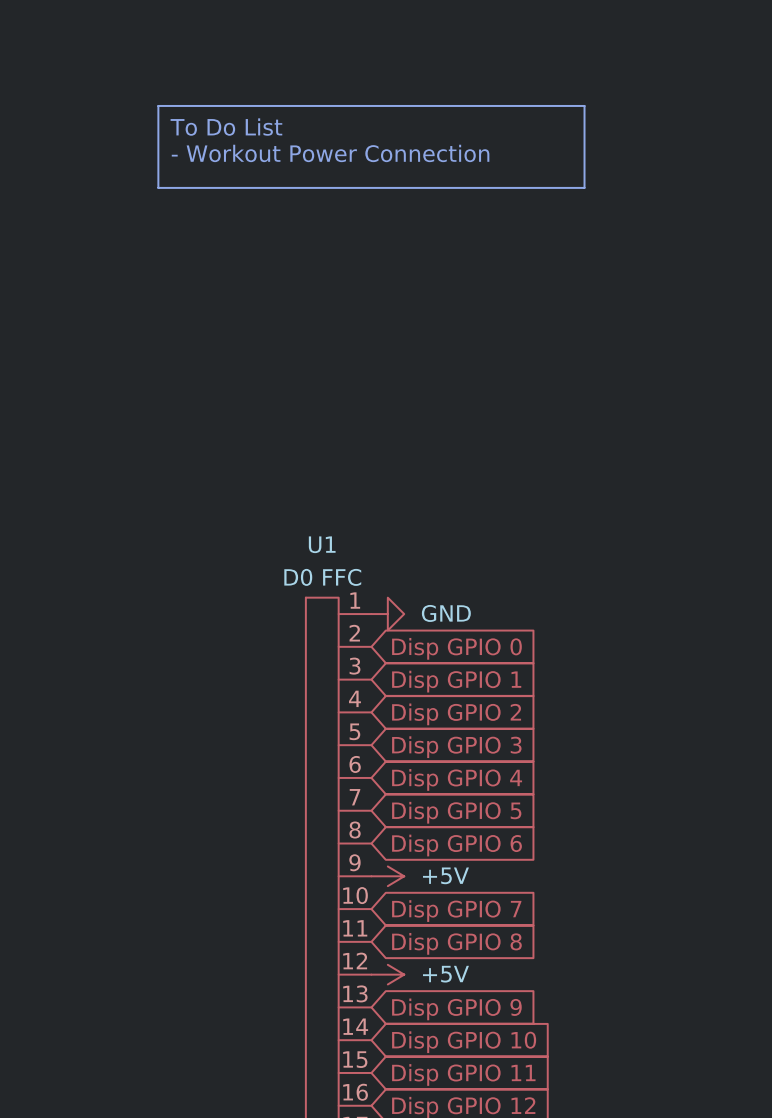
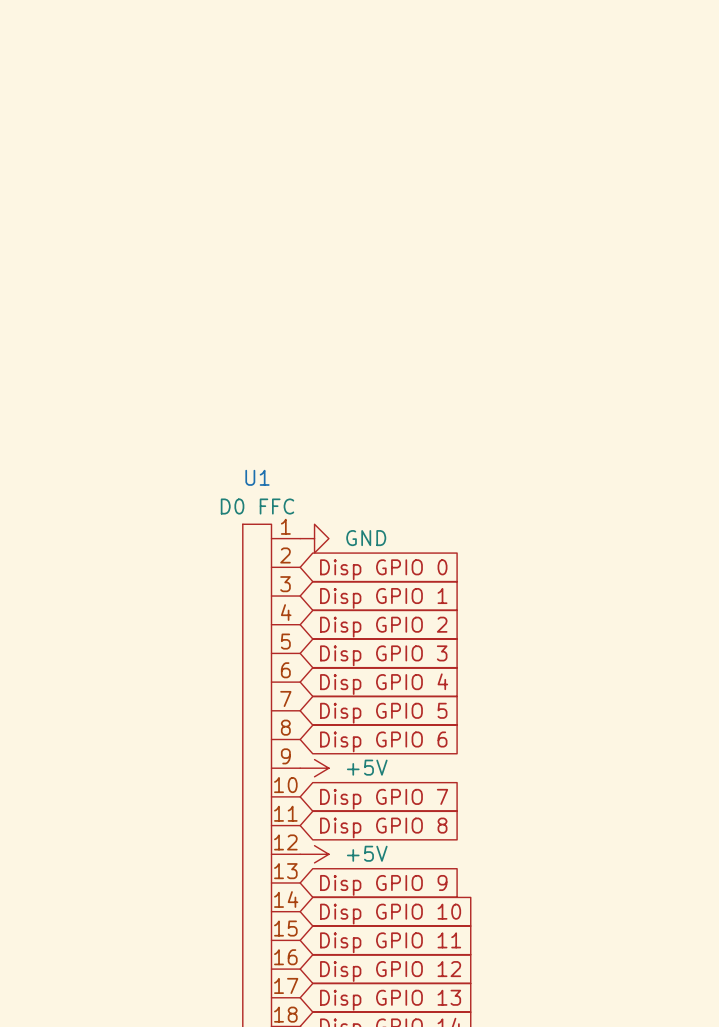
line: (158, 105) (584, 105) (584, 187) (158, 187) (158, 105) -> none
text: To Do List (226, 127) -> none
text: - Workout Power Connection (330, 153) -> none

